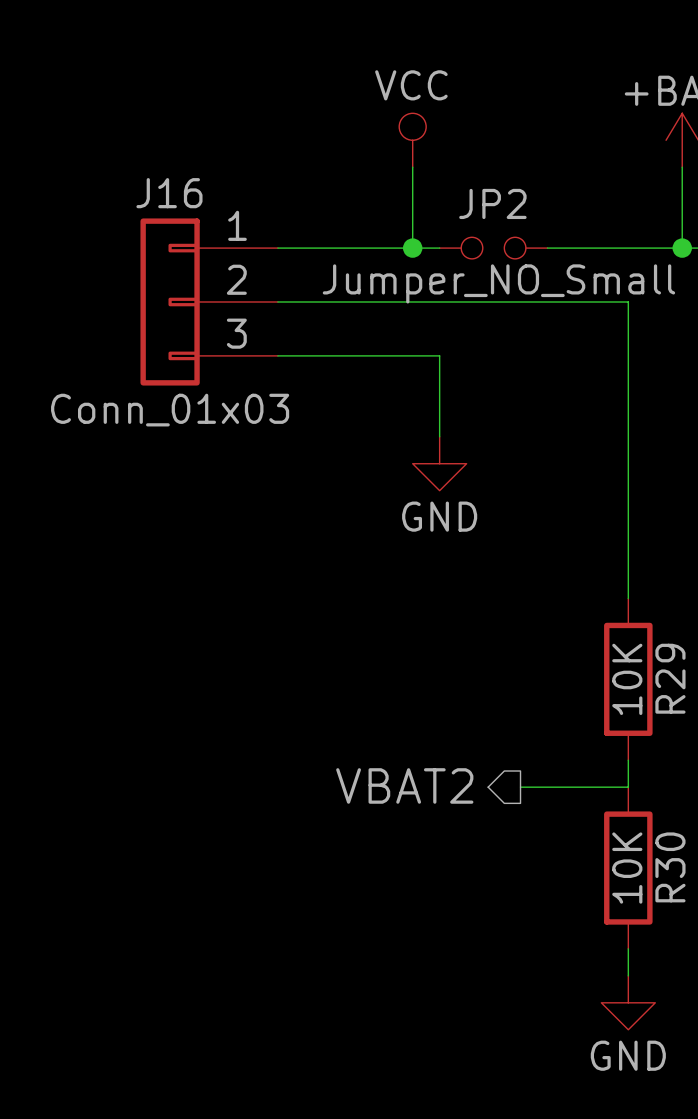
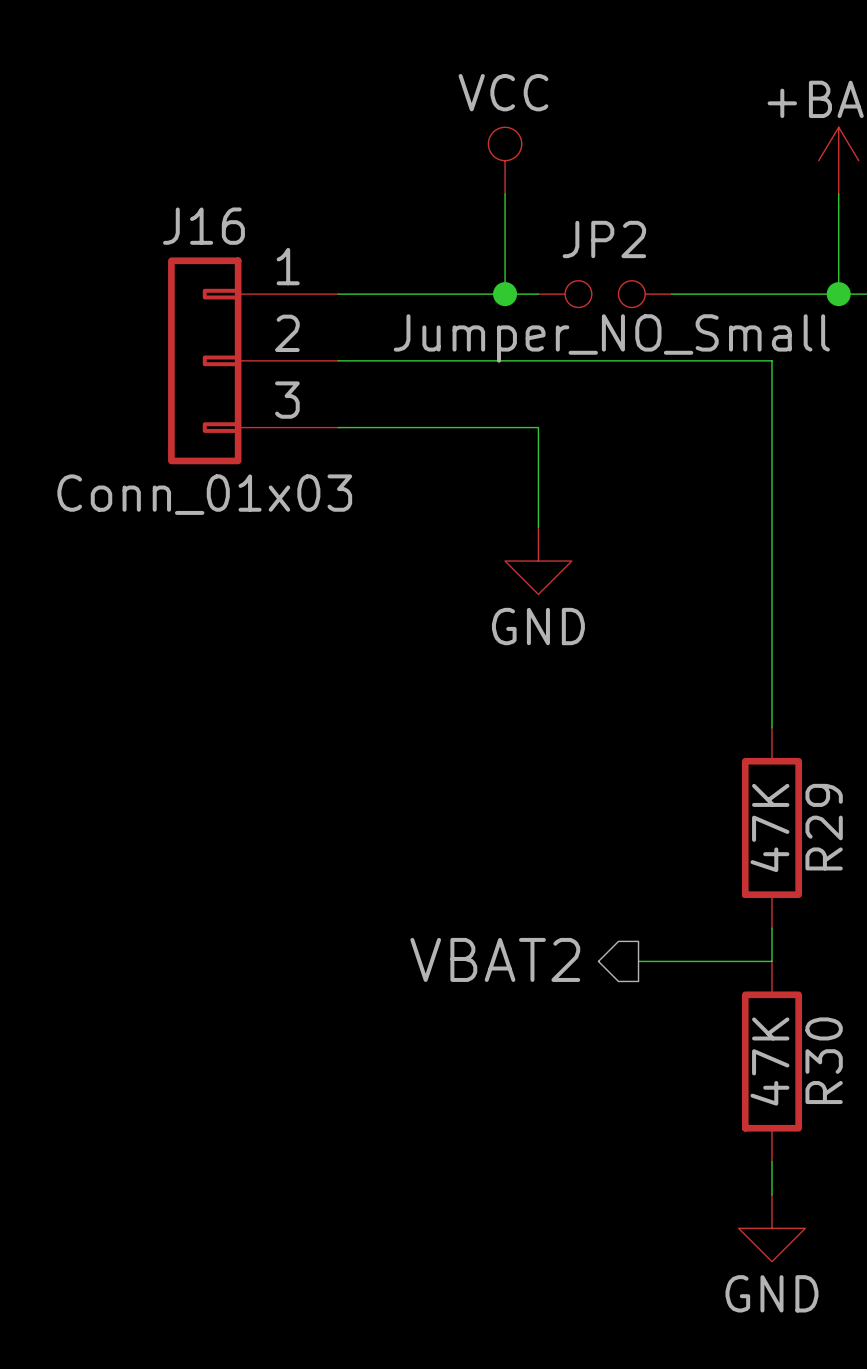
R29 value: 10K (627, 679) -> 47K (769, 827)
R30 value: 10K (627, 868) -> 47K (769, 1061)

